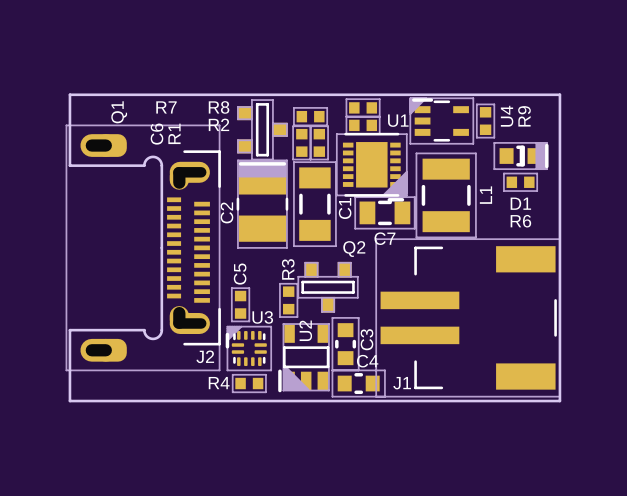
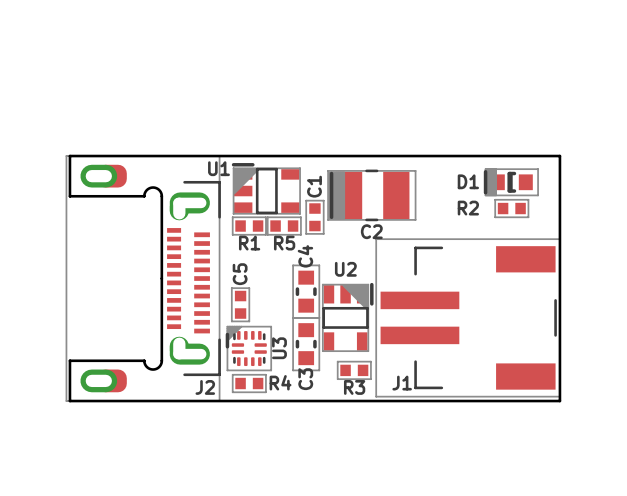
R8: (363, 107) -> none
R7: (310, 116) -> none
U1 name position: U1 (398, 120) -> U1 (218, 168)
U4: (441, 121) -> none
R9: (485, 121) -> none
R2 name position: R2 (218, 124) -> R2 (468, 208)
board edge: (69, 125) (69, 94) (559, 94) (559, 156) -> (69, 156) (559, 156)
R2 position: (363, 125) -> (511, 208)
Q1: (262, 129) -> none
U1 footprint: [335, 132, 408, 202] -> [231, 163, 301, 215]
R1 name position: R1 (174, 133) -> R1 (249, 243)
C6: (301, 142) -> none
R1 rotation: 0° (319, 142) -> 90° clockwise (284, 226)
R1 position: (319, 142) -> (284, 226)
D1 rotation: 0° (521, 156) -> 180° (511, 182)
C1 footprint: [293, 161, 337, 248] -> [305, 199, 325, 235]
R6: (520, 182) -> none
L1: (446, 195) -> none
D1 name position: D1 (520, 203) -> D1 (468, 181)
C2 rotation: 0° (262, 204) -> 90° counterclockwise (371, 195)
C2 position: (262, 204) -> (371, 195)
C1 name position: C1 (345, 208) -> C1 (314, 186)
C7: (384, 212) -> none
R5: none -> (249, 226)
J2 position: (143, 247) -> (143, 278)
R3 name position: R3 (288, 269) -> R3 (354, 387)
Q2: (328, 287) -> none
R3 rotation: 0° (288, 300) -> 90° clockwise (354, 370)
R3 position: (288, 300) -> (354, 370)
U3 name rotation: 0° (262, 317) -> 90° counterclockwise (279, 348)
U3 name position: U3 (262, 317) -> U3 (279, 348)
C3 name position: C3 (366, 339) -> C3 (305, 379)
C3 position: (345, 344) -> (306, 344)
U2 rotation: 0° (304, 357) -> 180° (347, 317)
U2 position: (304, 357) -> (347, 317)
board edge: (69, 370) (69, 401) -> none
R4 name position: R4 (219, 383) -> R4 (280, 382)
C4 rotation: 0° (358, 383) -> 90° clockwise (306, 291)
C4 position: (358, 383) -> (306, 291)

